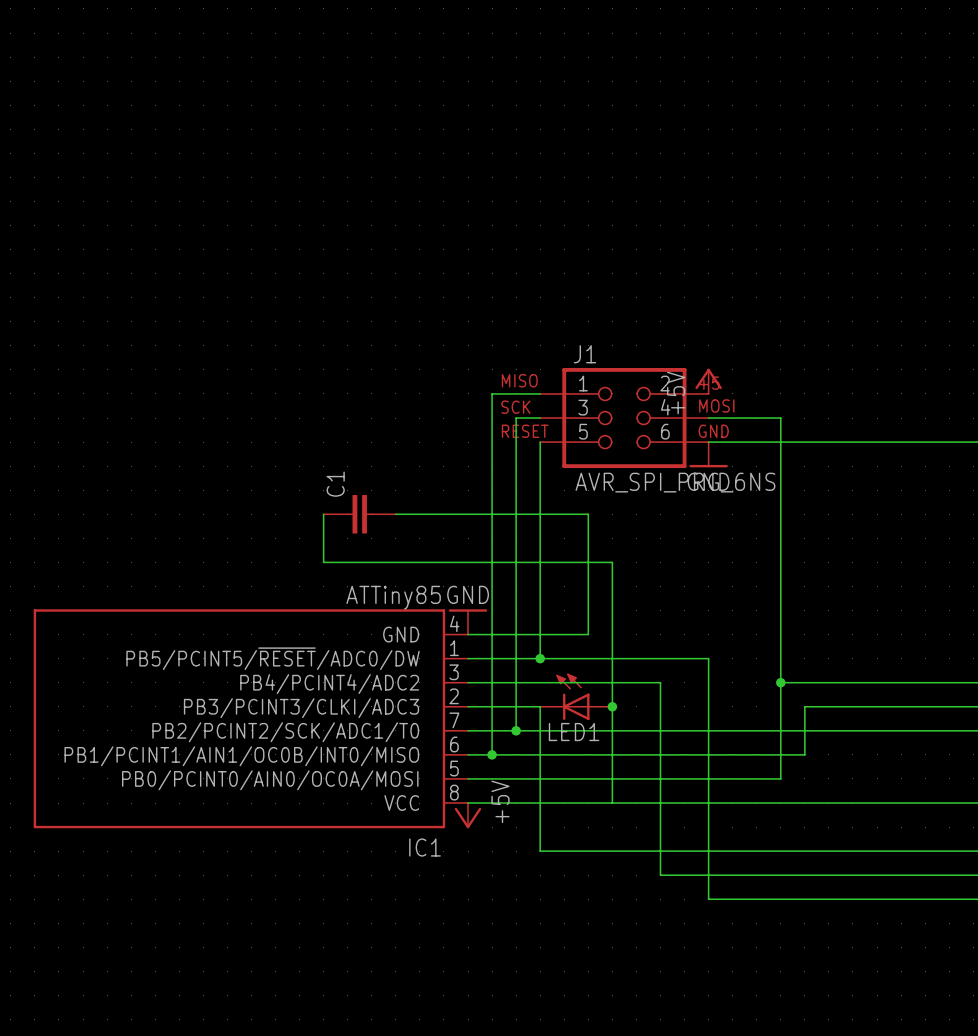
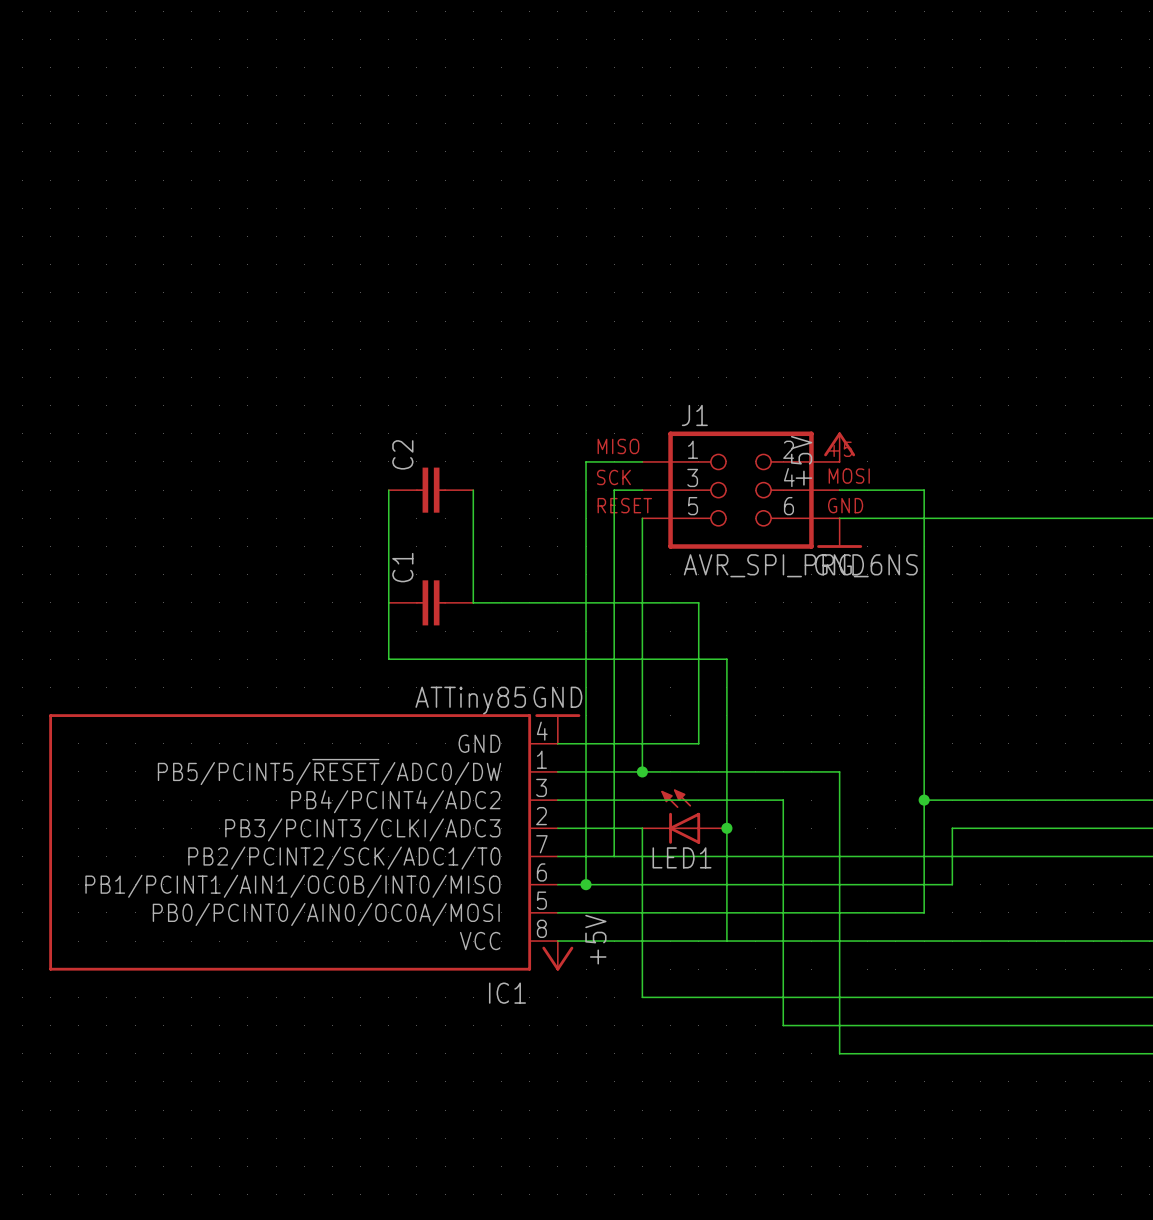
wire: none -> (388, 490) (388, 602)
C2: none -> (431, 490)
wire: none -> (473, 490) (473, 602)
junction: (516, 730) -> none

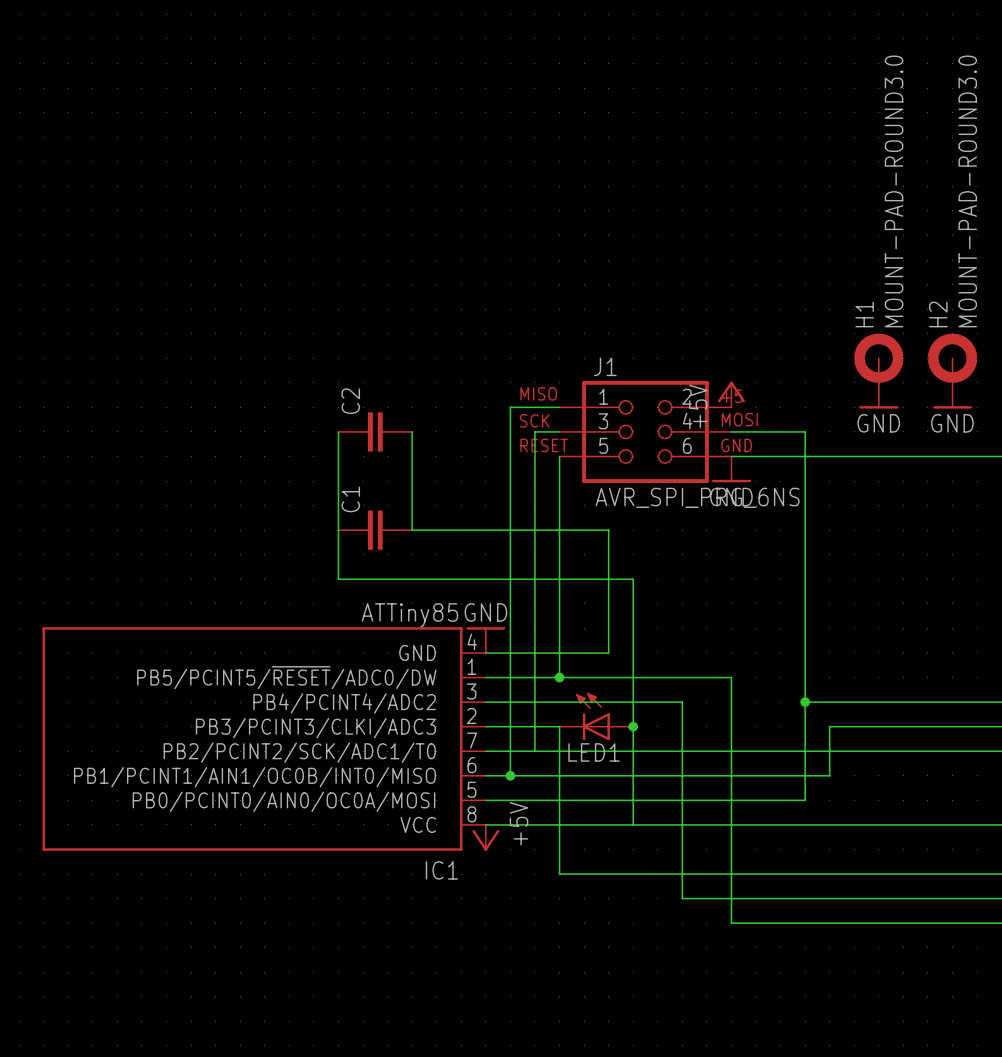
H1: none -> MOUNT-PAD-ROUND3.0 (878, 358)
H2: none -> MOUNT-PAD-ROUND3.0 (952, 358)
power symbol: none -> GND (878, 395)
power symbol: none -> GND (952, 395)

